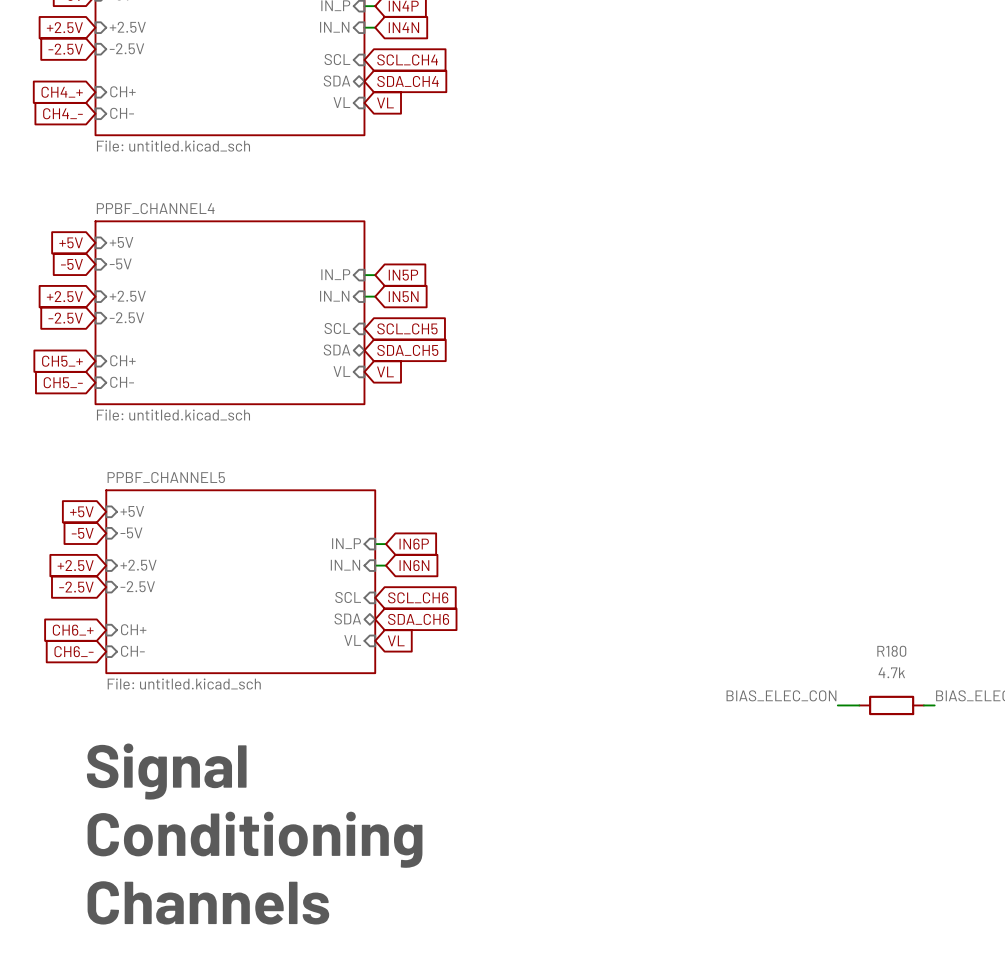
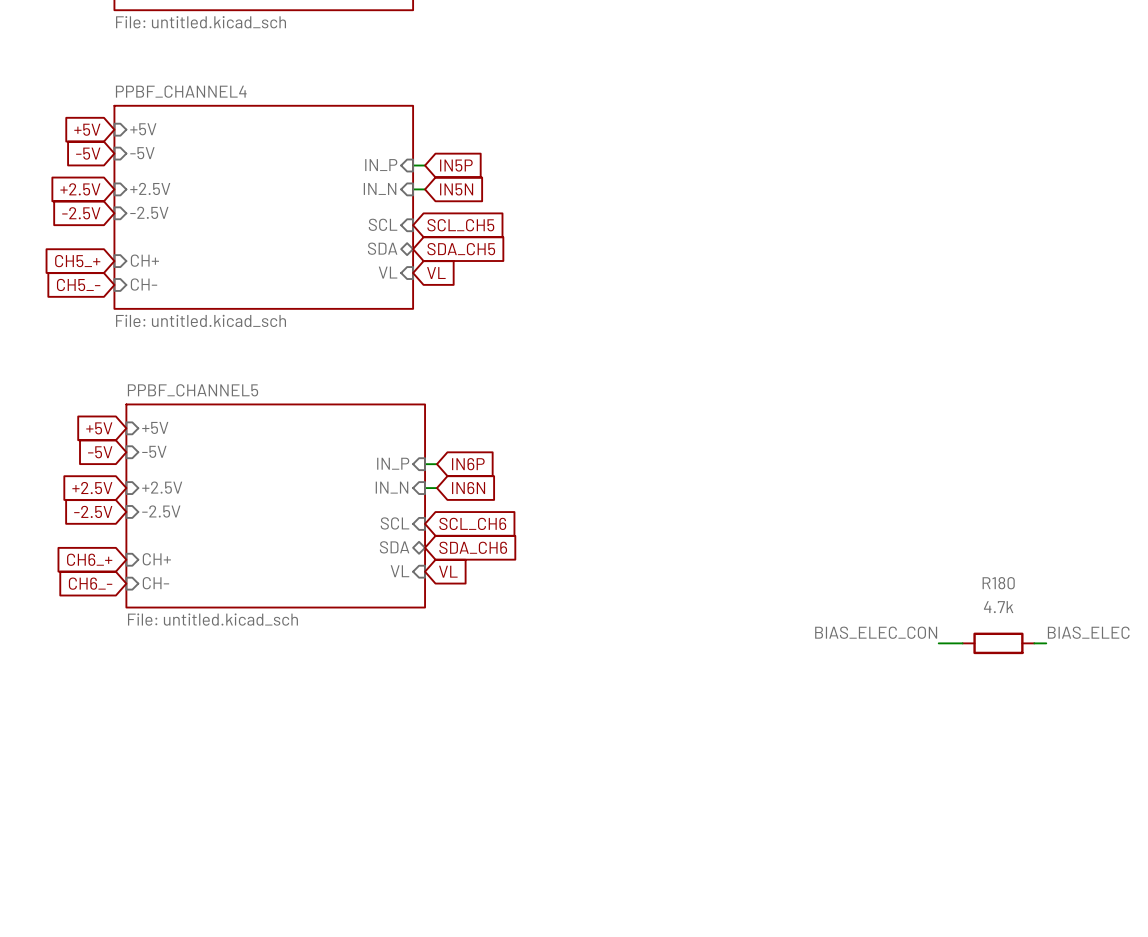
text: Signal (166, 771) -> none
text: Conditioning (255, 839) -> none
text: Channels (208, 902) -> none

